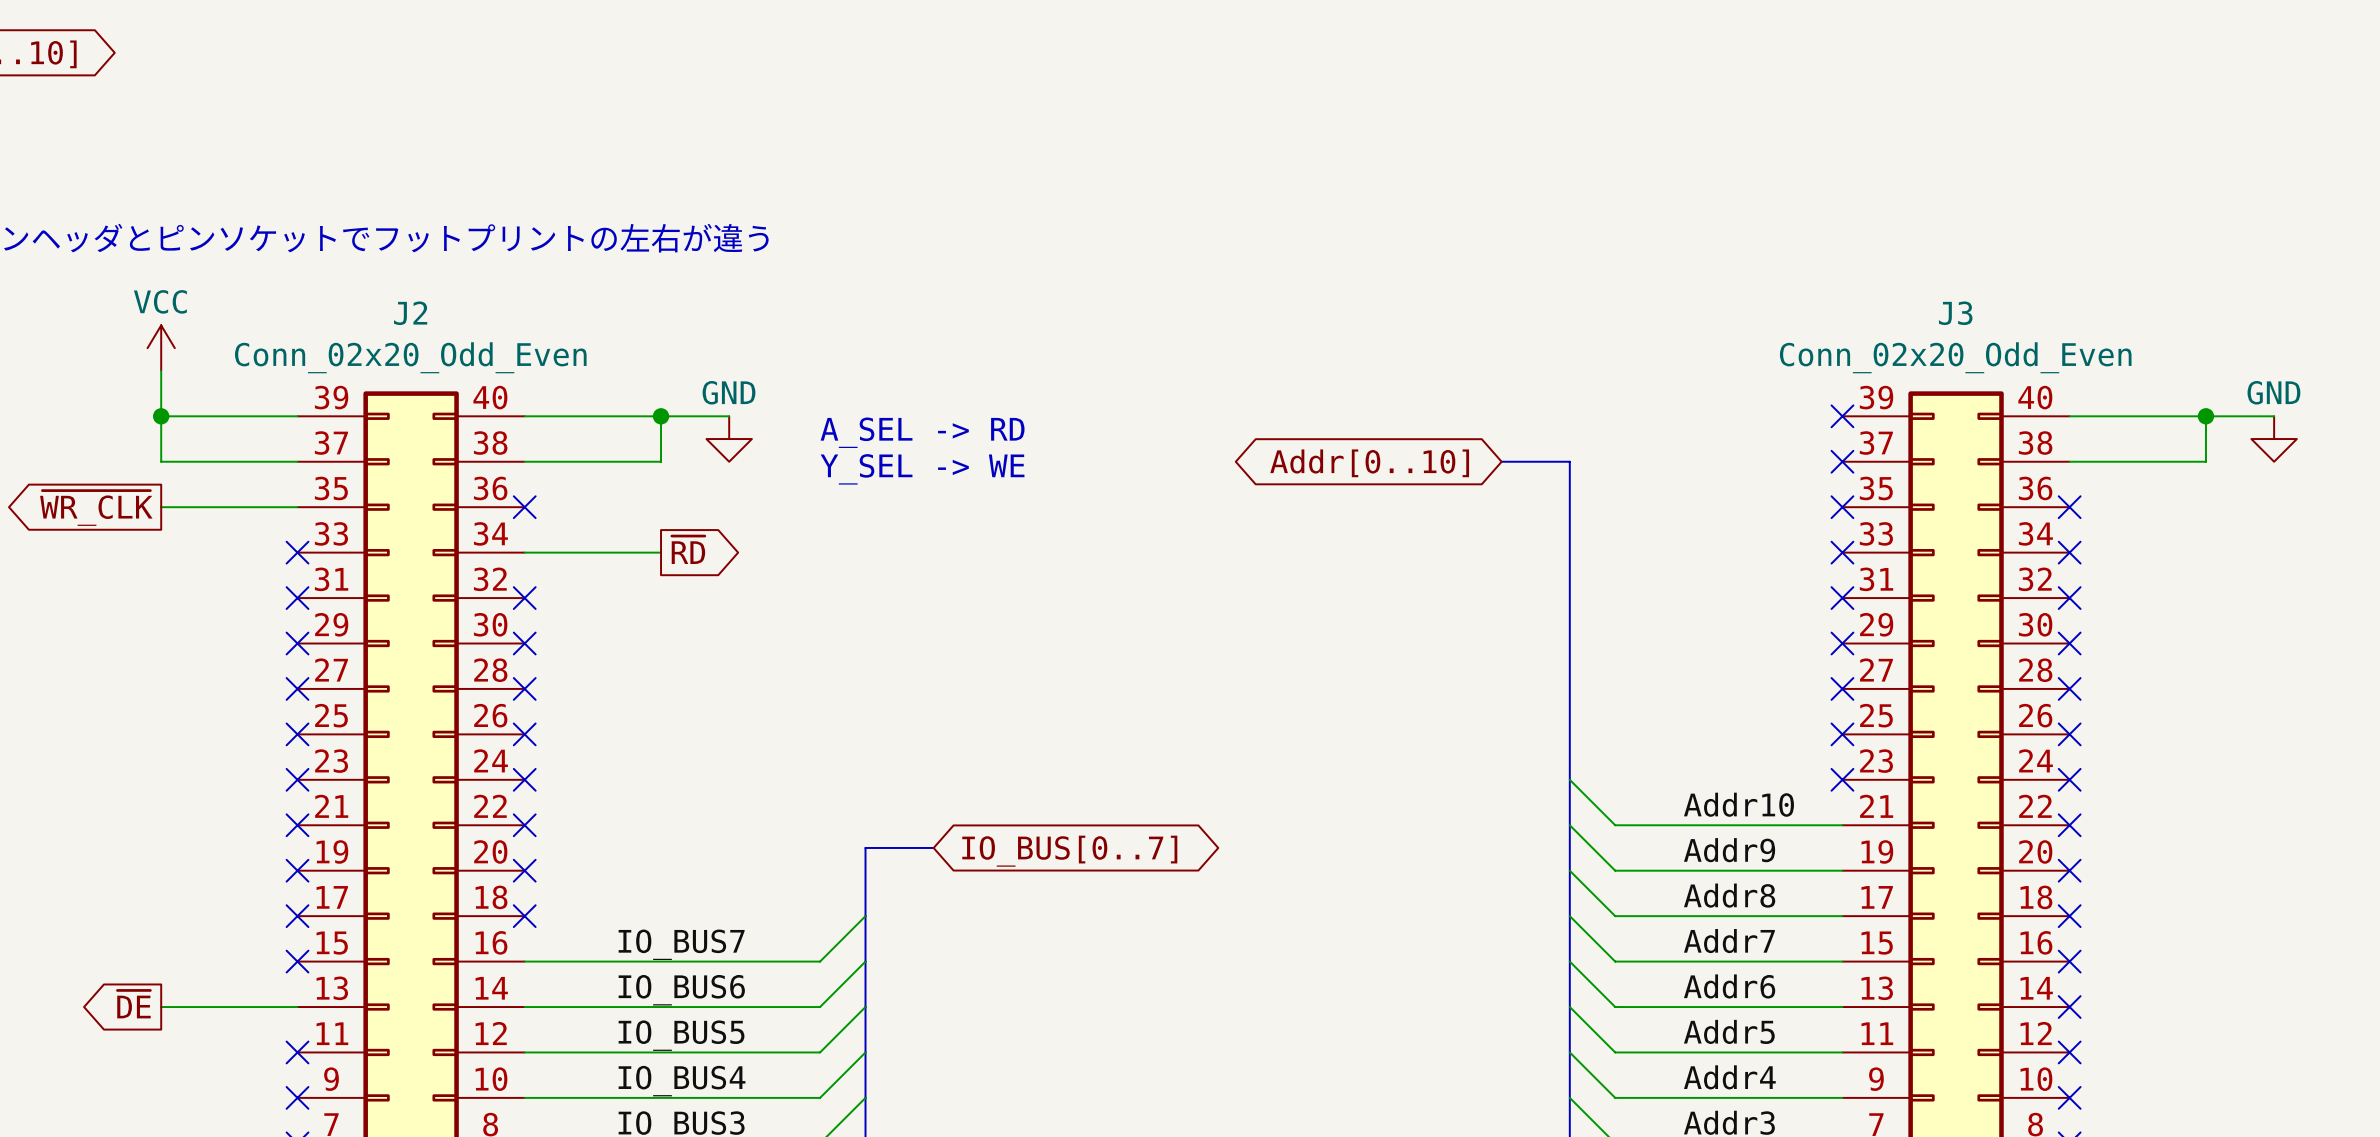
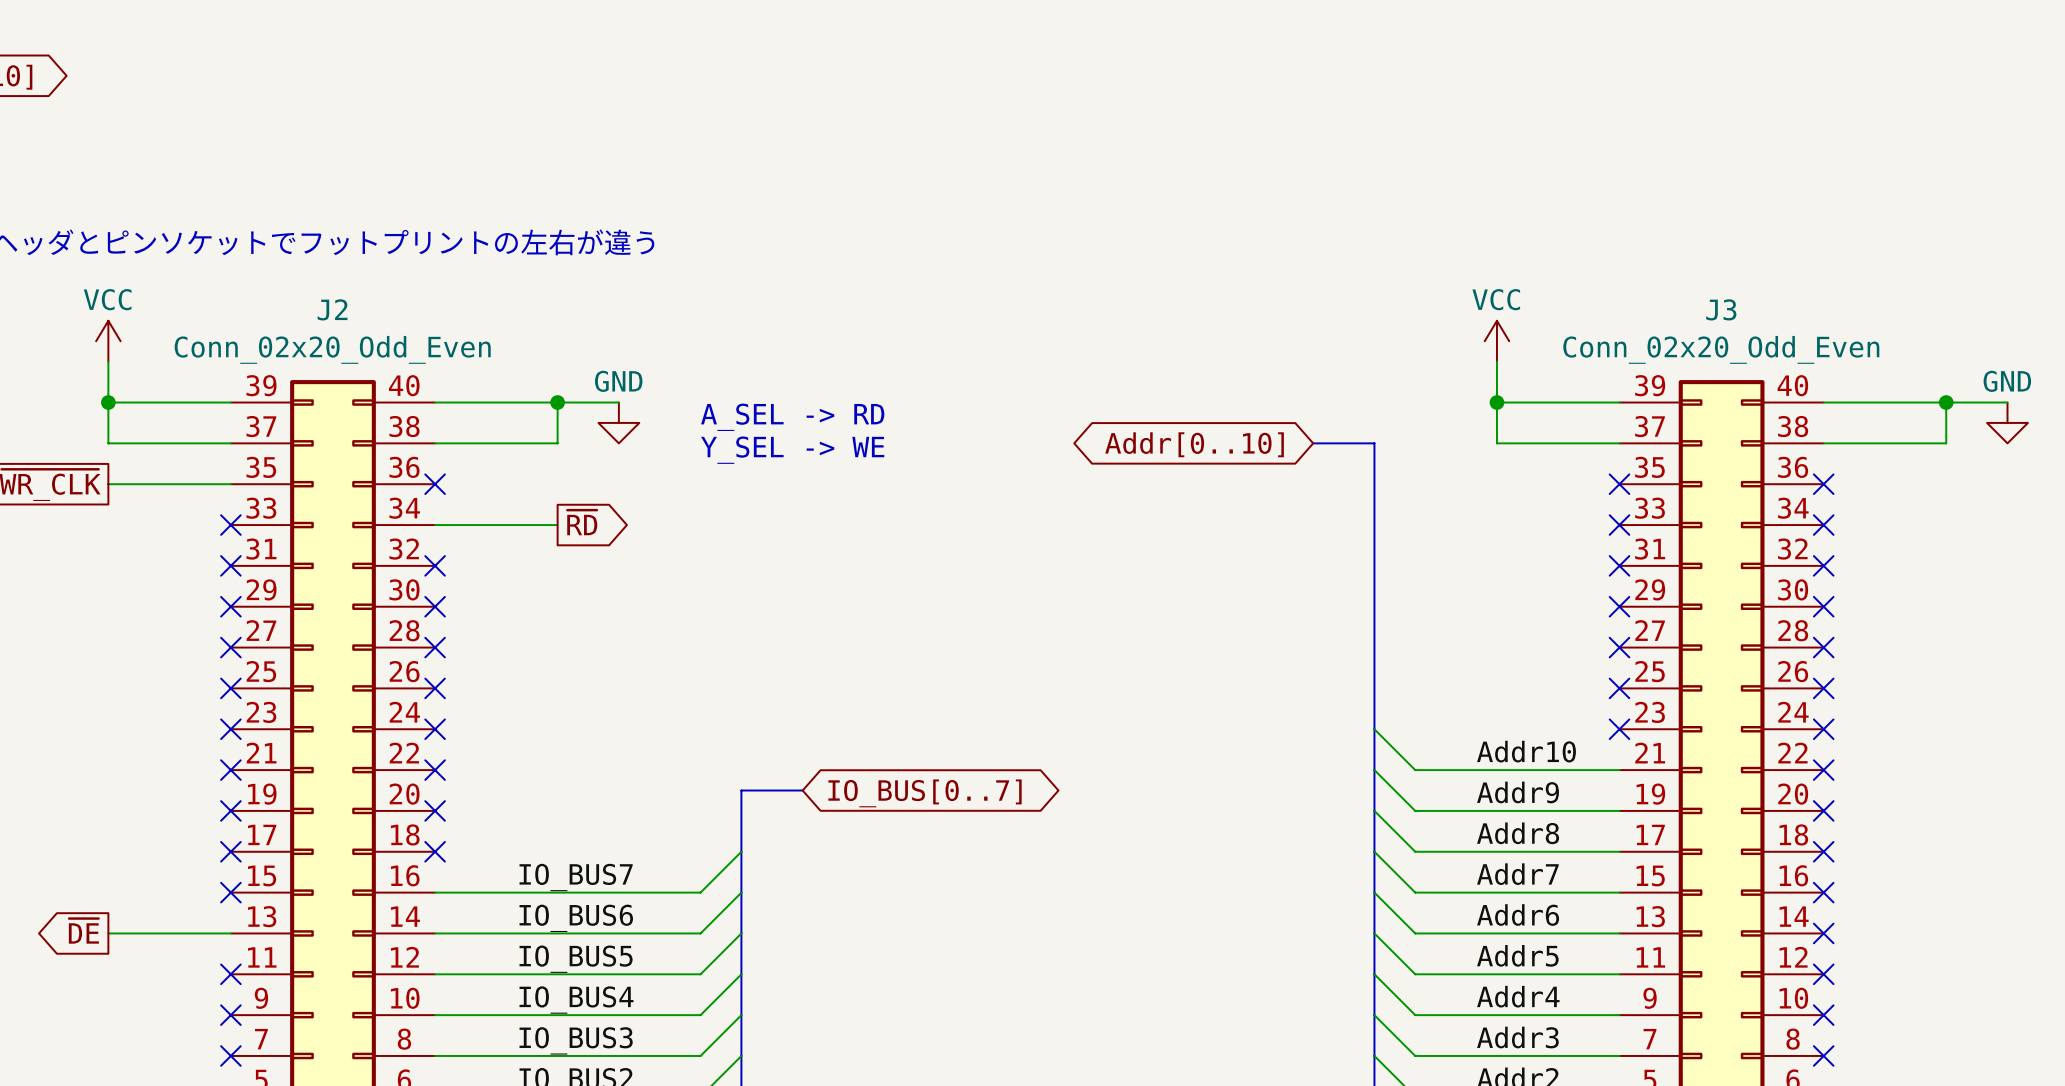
power symbol: none -> VCC (1496, 341)
wire: none -> (1496, 361) (1496, 443) (1619, 443)
wire: none -> (1496, 402) (1619, 402)
junction: none -> (1496, 402)
no-connect mark: (1842, 416) -> none
no-connect mark: (1842, 461) -> none

